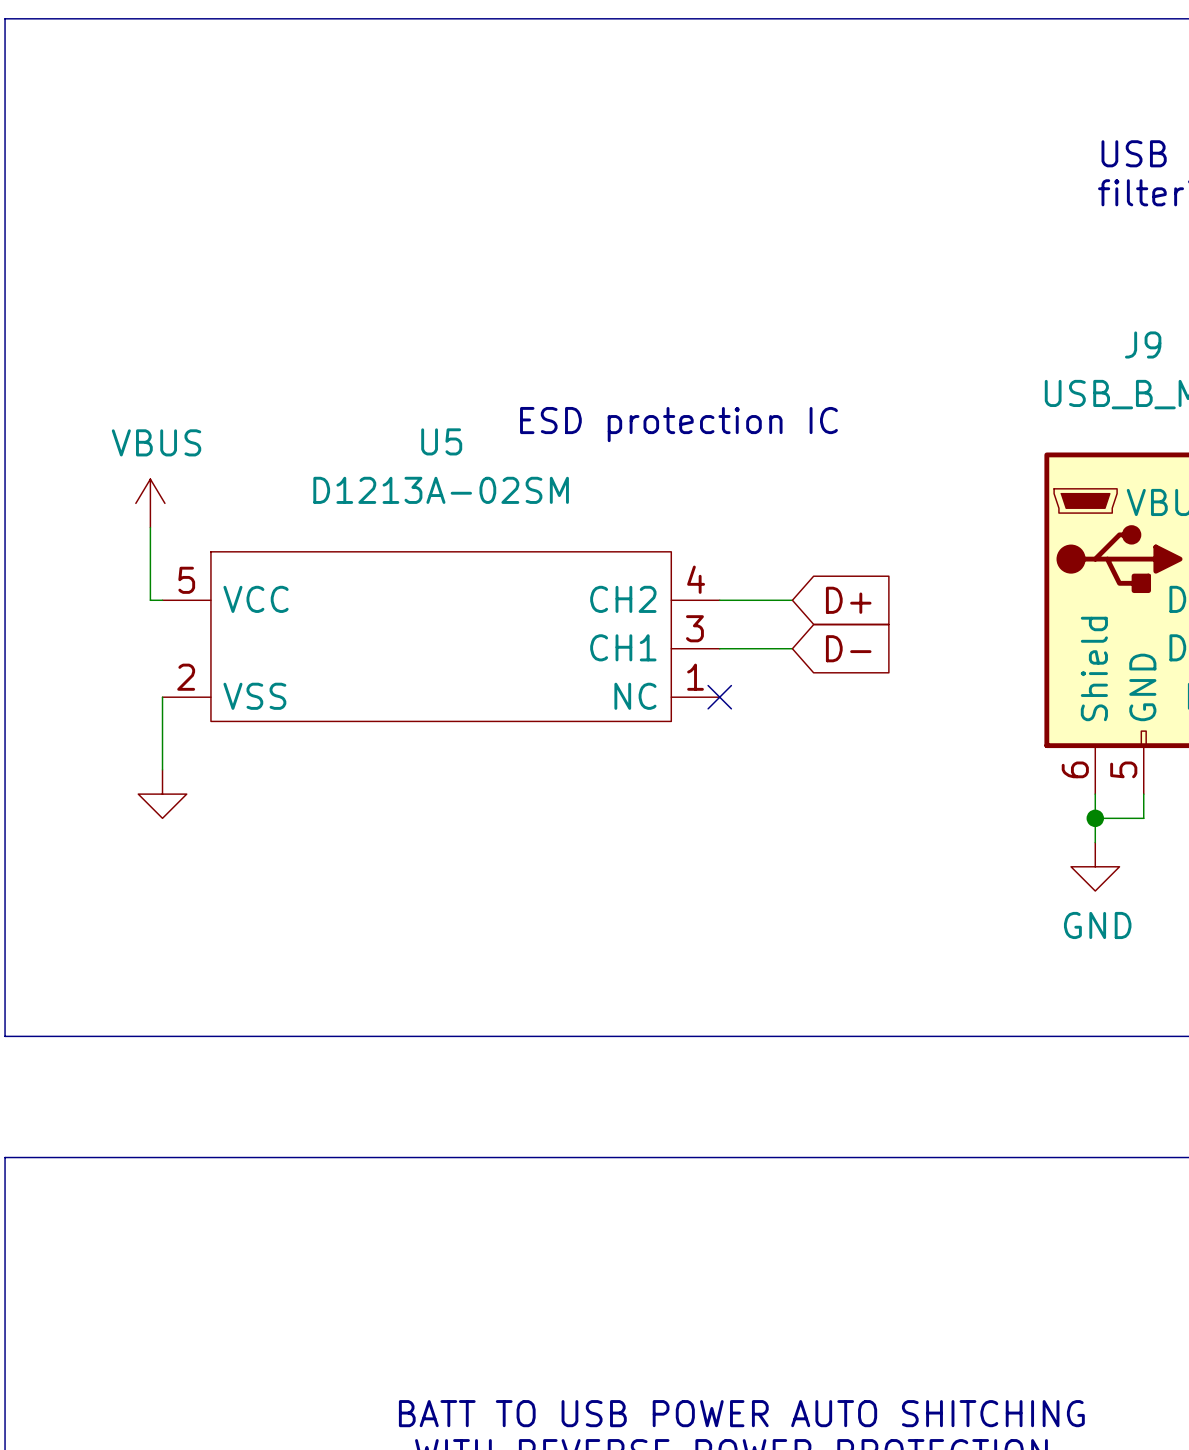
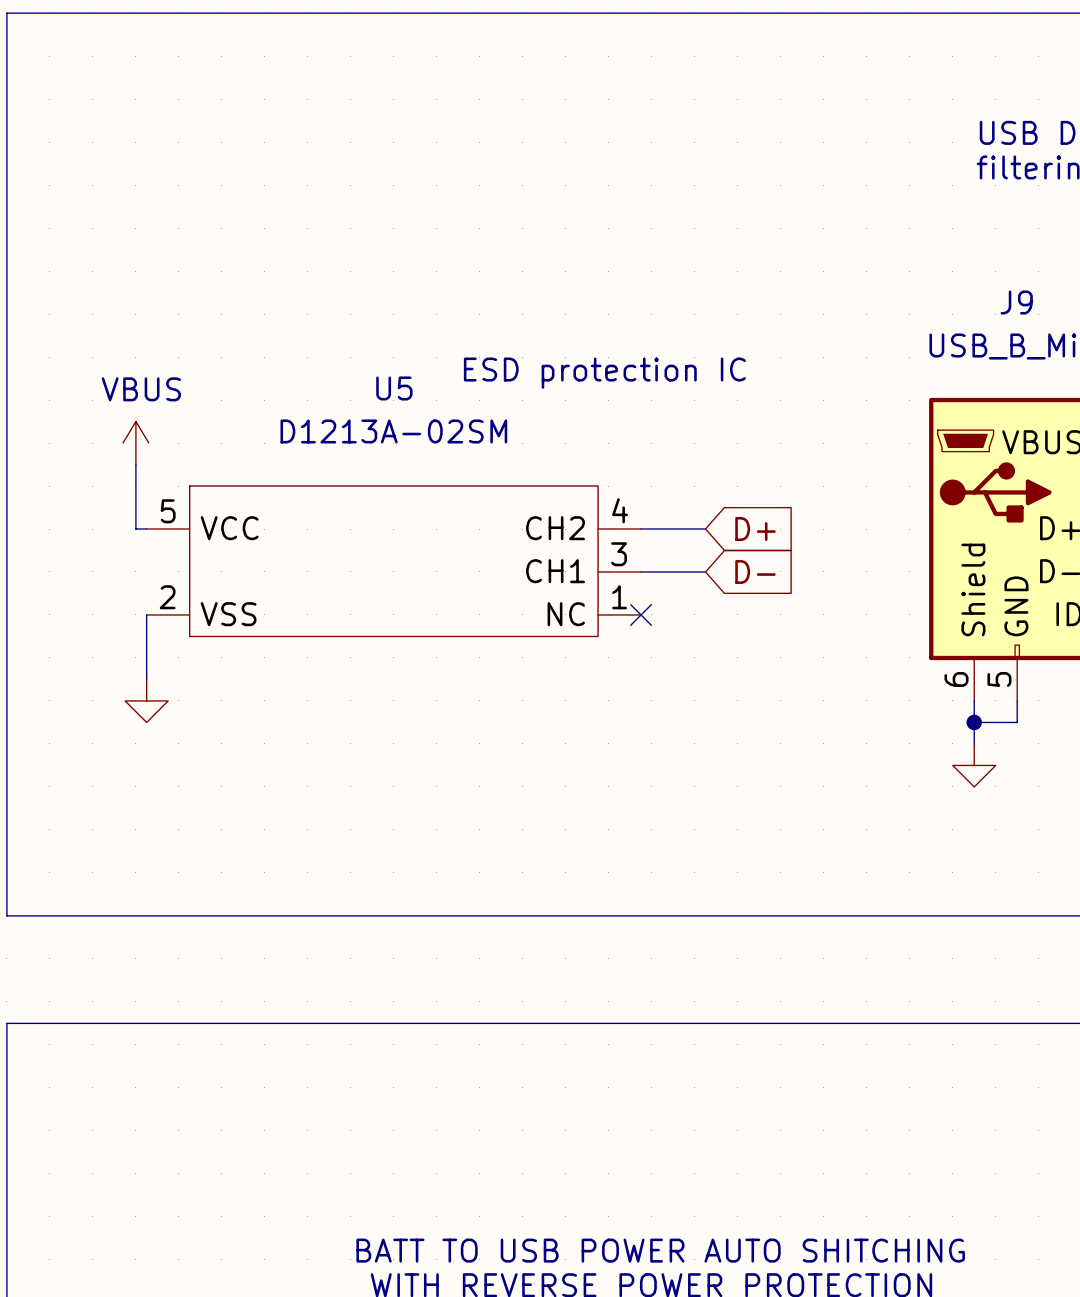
power symbol text: GND (1097, 925) -> none

